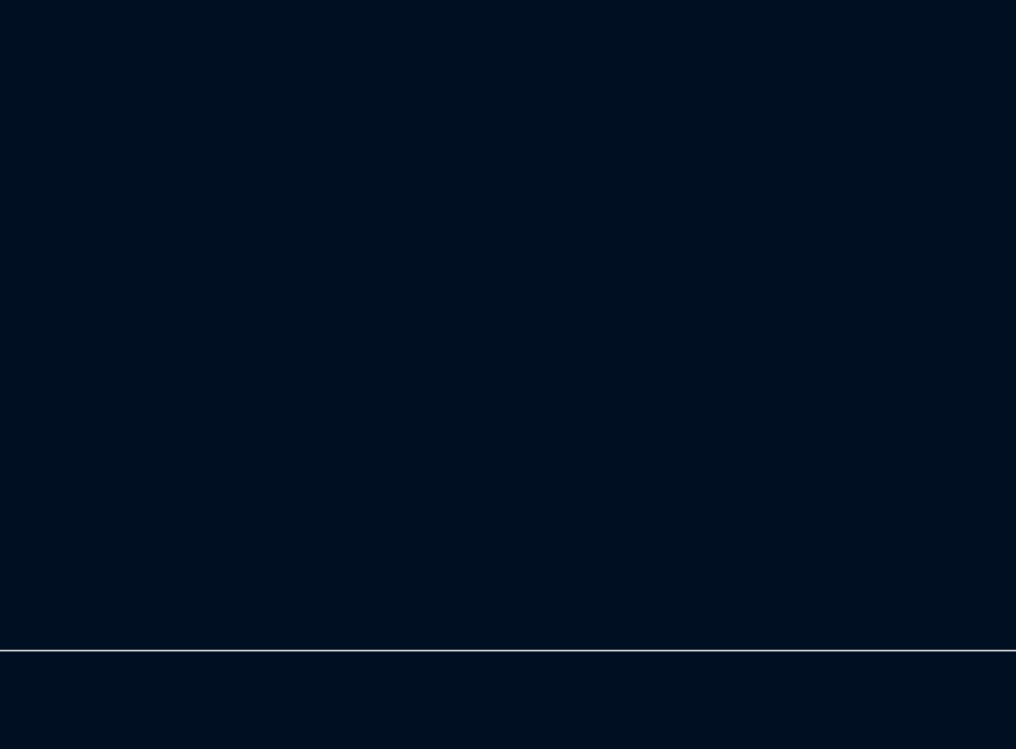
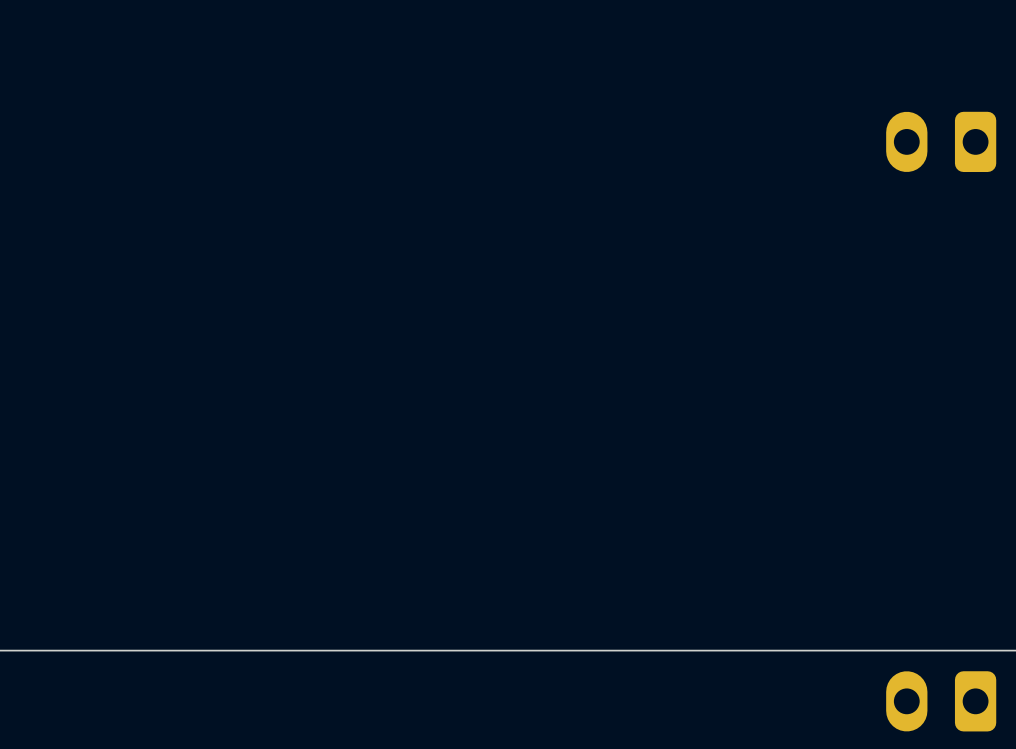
part: none -> (941, 141)
part: none -> (941, 701)

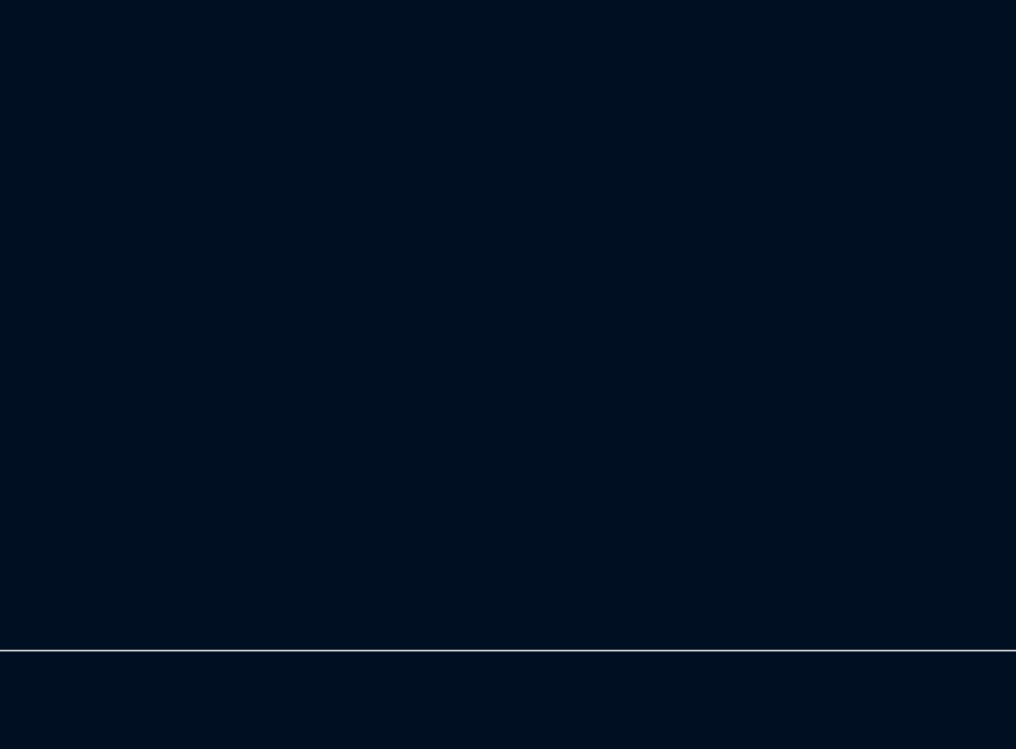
part: (941, 141) -> none
part: (941, 701) -> none

